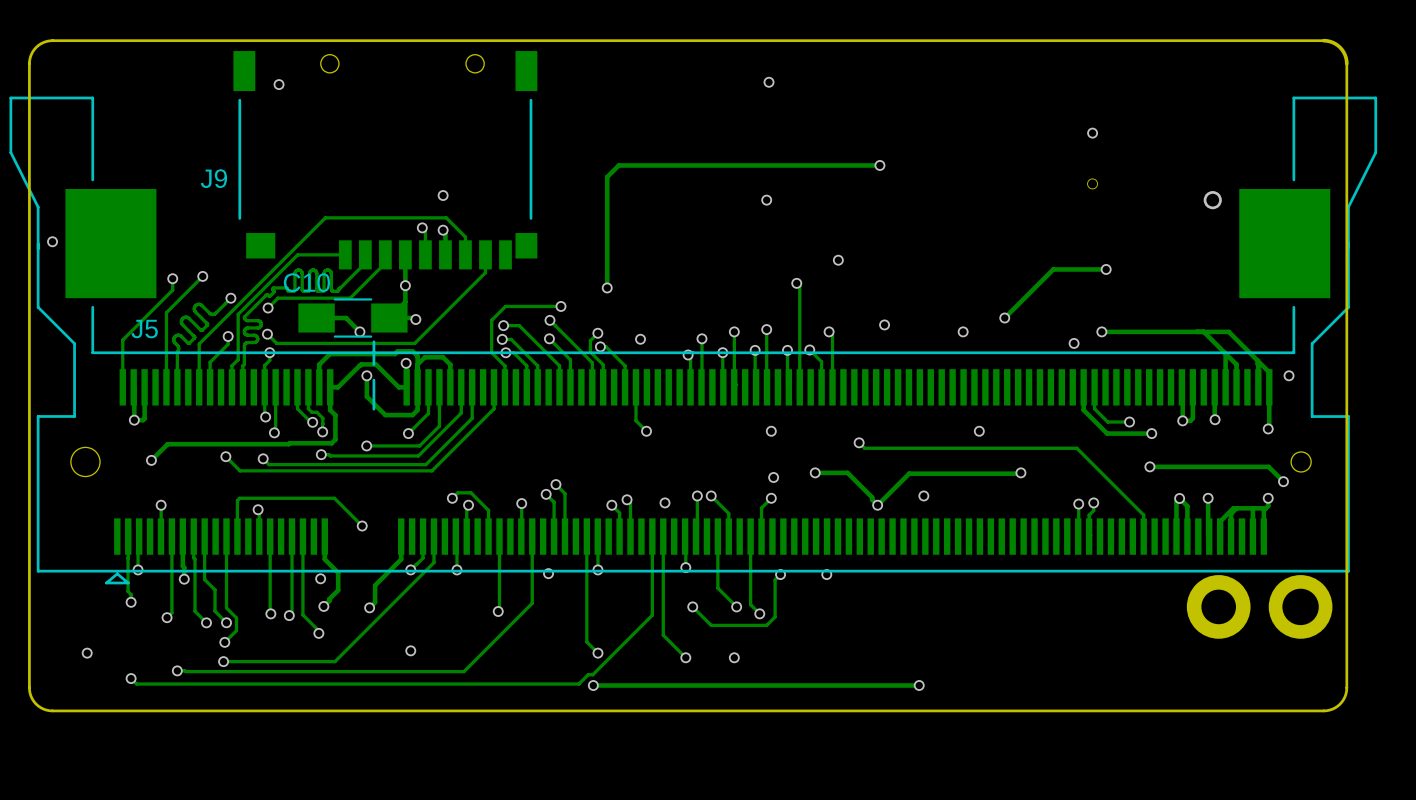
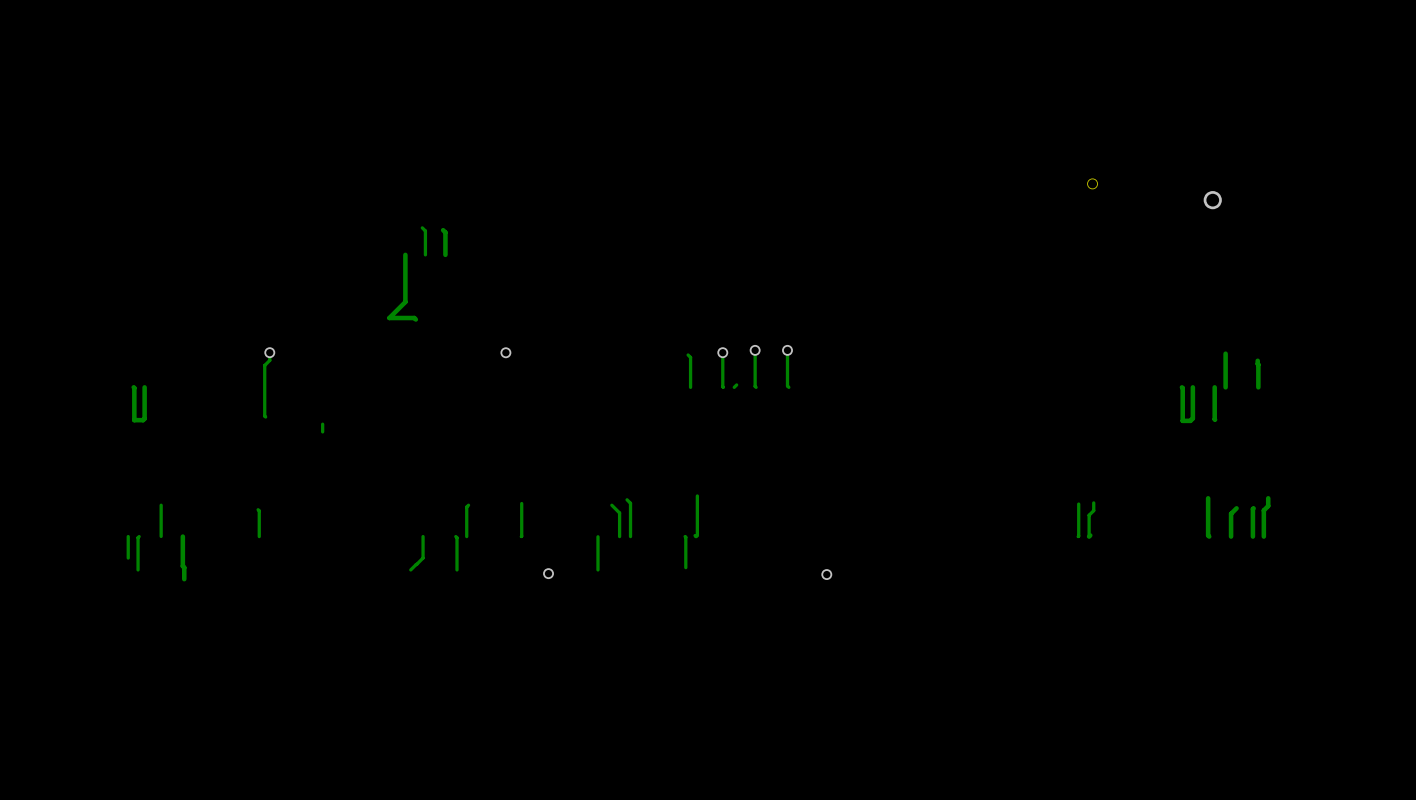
board edge: (1323, 40) (52, 40) (40, 43) (32, 52) (29, 63) (29, 687) (32, 699) (40, 707) (52, 710) (1323, 710) (1335, 707) (1343, 699) (1346, 687) (1346, 63) (1345, 54) (1340, 47) (1332, 42) (1323, 40) -> none
via: (769, 82) -> none
via: (279, 84) -> none
via: (1092, 133) -> none
J9: (385, 160) -> none
track: (879, 165) (618, 165) (607, 177) (607, 287) -> none
via: (879, 165) -> none
via: (443, 195) -> none
via: (766, 200) -> none
via: (422, 227) -> none
via: (443, 230) -> none
via: (52, 241) -> none
track: (345, 254) (297, 254) (238, 314) (238, 359) (231, 365) (231, 387) -> none
track: (365, 254) (365, 263) (338, 290) (332, 291) (331, 287) -> none
track: (385, 254) (385, 263) (350, 298) (277, 298) (268, 308) -> none
track: (465, 254) (465, 237) (446, 217) (325, 217) (199, 344) (199, 387) -> none
track: (485, 254) (485, 272) (414, 343) (276, 343) (267, 334) -> none
via: (838, 260) -> none
track: (1106, 269) (1053, 269) (1004, 318) -> none
via: (1106, 269) -> none
track: (202, 276) (166, 312) (166, 387) -> none
via: (202, 276) -> none
track: (172, 278) (172, 290) (122, 340) (122, 387) -> none
via: (172, 278) -> none
track: (796, 283) (799, 286) (799, 387) -> none
via: (796, 283) -> none
via: (405, 285) -> none
track: (331, 287) (331, 272) (326, 270) (324, 272) (323, 290) (317, 290) (316, 272) (312, 270) (309, 272) (309, 290) (303, 291) (302, 272) (297, 270) (295, 272) (294, 290) (288, 291) (286, 288) (273, 287) (273, 292) (270, 295) (265, 295) (244, 317) (247, 320) (259, 321) (261, 324) (259, 327) (247, 328) (244, 330) (246, 334) (255, 335) (257, 338) (255, 342) (247, 342) (244, 345) (242, 387) -> none
via: (607, 287) -> none
track: (230, 298) (213, 314) (201, 305) (195, 305) (194, 311) (207, 323) -> none
via: (230, 298) -> none
track: (561, 306) (505, 306) (491, 320) (491, 352) (504, 365) (504, 387) -> none
via: (561, 306) -> none
via: (268, 308) -> none
track: (316, 318) (346, 318) (359, 331) -> none
C10: (352, 318) -> none
via: (1004, 318) -> none
via: (415, 319) -> none
track: (549, 320) (592, 362) (592, 387) -> none
via: (549, 320) -> none
via: (884, 324) -> none
track: (207, 325) (202, 330) -> none
track: (503, 325) (519, 325) (559, 365) (559, 387) -> none
via: (503, 325) -> none
track: (766, 329) (767, 387) -> none
via: (766, 329) -> none
track: (200, 330) (188, 317) (182, 318) (182, 324) (194, 336) -> none
via: (359, 331) -> none
track: (734, 331) (734, 387) -> none
via: (734, 331) -> none
track: (829, 331) (832, 335) (832, 387) -> none
via: (829, 331) -> none
via: (963, 331) -> none
track: (1101, 331) (1228, 331) (1269, 372) (1268, 428) -> none
via: (1101, 331) -> none
track: (1203, 331) (1236, 364) (1236, 387) -> none
track: (597, 333) (590, 340) (590, 352) (603, 364) (603, 387) -> none
via: (597, 333) -> none
via: (267, 334) -> none
track: (228, 336) (228, 344) (210, 362) (210, 387) -> none
via: (228, 336) -> none
track: (194, 338) (189, 342) -> none
track: (549, 338) (570, 359) (570, 387) -> none
via: (549, 338) -> none
track: (701, 338) (701, 387) -> none
via: (701, 338) -> none
track: (502, 339) (511, 339) (537, 365) (537, 387) -> none
via: (502, 339) -> none
via: (640, 339) -> none
J5: (693, 340) -> none
track: (187, 342) (179, 335) (173, 338) (178, 348) (177, 387) -> none
via: (1074, 343) -> none
track: (600, 346) (606, 346) (625, 365) (625, 387) -> none
via: (600, 346) -> none
track: (809, 349) (821, 361) (821, 387) -> none
via: (809, 349) -> none
track: (505, 352) (513, 352) (526, 365) (526, 387) -> none
via: (688, 354) -> none
track: (406, 363) (406, 387) (398, 387) (376, 364) (361, 364) (337, 387) (330, 387) (330, 410) (335, 415) (335, 439) (331, 443) (167, 444) (151, 460) -> none
via: (406, 363) -> none
track: (417, 364) (424, 357) (443, 357) (450, 364) (450, 387) -> none
track: (366, 375) (366, 396) (385, 415) (412, 415) (417, 410) (417, 356) (412, 351) (397, 351) (395, 354) (329, 354) (319, 364) (319, 387) -> none
via: (366, 375) -> none
via: (1289, 375) -> none
track: (275, 387) (274, 432) -> none
track: (297, 387) (297, 408) (312, 422) -> none
track: (308, 387) (308, 408) (311, 412) (316, 412) (322, 418) (322, 423) -> none
track: (428, 387) (428, 413) (408, 433) -> none
track: (439, 387) (439, 426) (419, 445) (366, 445) -> none
track: (461, 387) (461, 413) (418, 455) (321, 454) -> none
track: (472, 387) (472, 418) (425, 464) (269, 464) (263, 458) -> none
track: (494, 387) (494, 408) (432, 470) (240, 470) (225, 456) -> none
track: (635, 387) (635, 420) (646, 431) -> none
track: (1083, 387) (1083, 410) (1107, 433) (1151, 433) -> none
track: (1094, 387) (1094, 408) (1107, 422) (1129, 422) -> none
via: (265, 417) -> none
via: (1215, 419) -> none
via: (134, 420) -> none
via: (1182, 420) -> none
via: (312, 422) -> none
via: (1129, 422) -> none
via: (1268, 428) -> none
via: (322, 431) -> none
via: (646, 431) -> none
via: (771, 431) -> none
via: (979, 431) -> none
via: (274, 432) -> none
via: (408, 433) -> none
via: (1151, 433) -> none
track: (859, 442) (864, 448) (1076, 448) (1143, 515) (1143, 536) -> none
via: (859, 442) -> none
via: (366, 445) -> none
via: (321, 454) -> none
via: (225, 456) -> none
via: (263, 458) -> none
via: (151, 460) -> none
track: (1149, 466) (1268, 466) (1283, 481) -> none
via: (1149, 466) -> none
via: (815, 472) -> none
track: (1020, 472) (909, 473) (877, 505) (847, 472) (815, 472) -> none
via: (1020, 472) -> none
via: (773, 477) -> none
via: (1283, 481) -> none
track: (555, 484) (565, 493) (565, 536) -> none
via: (555, 484) -> none
track: (546, 494) (554, 502) (554, 536) -> none
via: (546, 494) -> none
via: (697, 495) -> none
track: (711, 495) (728, 513) (728, 536) -> none
via: (711, 495) -> none
via: (923, 495) -> none
track: (452, 498) (457, 492) (470, 492) (488, 510) (488, 536) -> none
via: (452, 498) -> none
track: (771, 498) (761, 508) (761, 536) -> none
via: (771, 498) -> none
via: (1179, 498) -> none
via: (1208, 498) -> none
via: (1268, 498) -> none
via: (627, 499) -> none
via: (665, 502) -> none
via: (1093, 502) -> none
via: (521, 503) -> none
via: (1078, 504) -> none
via: (161, 505) -> none
via: (468, 505) -> none
via: (611, 505) -> none
via: (877, 505) -> none
track: (1265, 508) (1233, 508) (1220, 521) (1220, 536) -> none
via: (258, 509) -> none
track: (362, 526) (334, 498) (239, 498) (237, 500) (237, 536) -> none
via: (362, 526) -> none
track: (171, 536) (171, 612) (167, 617) -> none
track: (193, 536) (195, 611) (206, 622) -> none
track: (204, 536) (204, 579) (215, 589) (215, 611) (226, 622) -> none
track: (226, 536) (226, 607) (236, 617) (236, 630) (224, 642) -> none
track: (270, 536) (270, 613) -> none
track: (292, 536) (292, 612) (289, 615) -> none
track: (302, 536) (302, 614) (318, 630) (318, 633) -> none
track: (324, 536) (324, 559) (338, 572) (338, 590) (323, 606) -> none
track: (401, 536) (401, 559) (375, 585) (375, 602) (369, 607) -> none
track: (433, 536) (433, 562) (334, 661) (223, 661) -> none
track: (499, 536) (498, 611) -> none
track: (532, 536) (532, 603) (463, 671) (177, 670) -> none
track: (586, 536) (586, 642) (597, 653) -> none
track: (652, 536) (652, 615) (592, 674) (588, 674) (578, 684) (136, 684) (131, 678) -> none
track: (663, 536) (663, 635) (685, 657) -> none
track: (717, 536) (717, 588) (736, 606) -> none
track: (750, 536) (750, 604) (759, 613) -> none
track: (1187, 536) (1187, 506) (1179, 498) (1176, 501) (1176, 536) -> none
track: (128, 558) (128, 591) (131, 594) (131, 602) -> none
via: (685, 567) -> none
via: (138, 569) -> none
via: (410, 569) -> none
via: (456, 569) -> none
via: (597, 569) -> none
track: (780, 574) (775, 580) (775, 617) (766, 625) (711, 625) (692, 606) -> none
via: (780, 574) -> none
via: (320, 578) -> none
via: (184, 579) -> none
via: (131, 602) -> none
via: (323, 606) -> none
via: (692, 606) -> none
via: (736, 606) -> none
part: (1259, 606) -> none
via: (369, 607) -> none
via: (498, 611) -> none
via: (270, 613) -> none
via: (759, 613) -> none
via: (289, 615) -> none
via: (167, 617) -> none
via: (206, 622) -> none
via: (226, 622) -> none
via: (318, 633) -> none
via: (224, 642) -> none
via: (410, 650) -> none
via: (87, 653) -> none
via: (597, 653) -> none
via: (685, 657) -> none
via: (734, 657) -> none
via: (223, 661) -> none
via: (177, 670) -> none
via: (131, 678) -> none
via: (593, 685) -> none
track: (919, 685) (593, 685) -> none
via: (919, 685) -> none

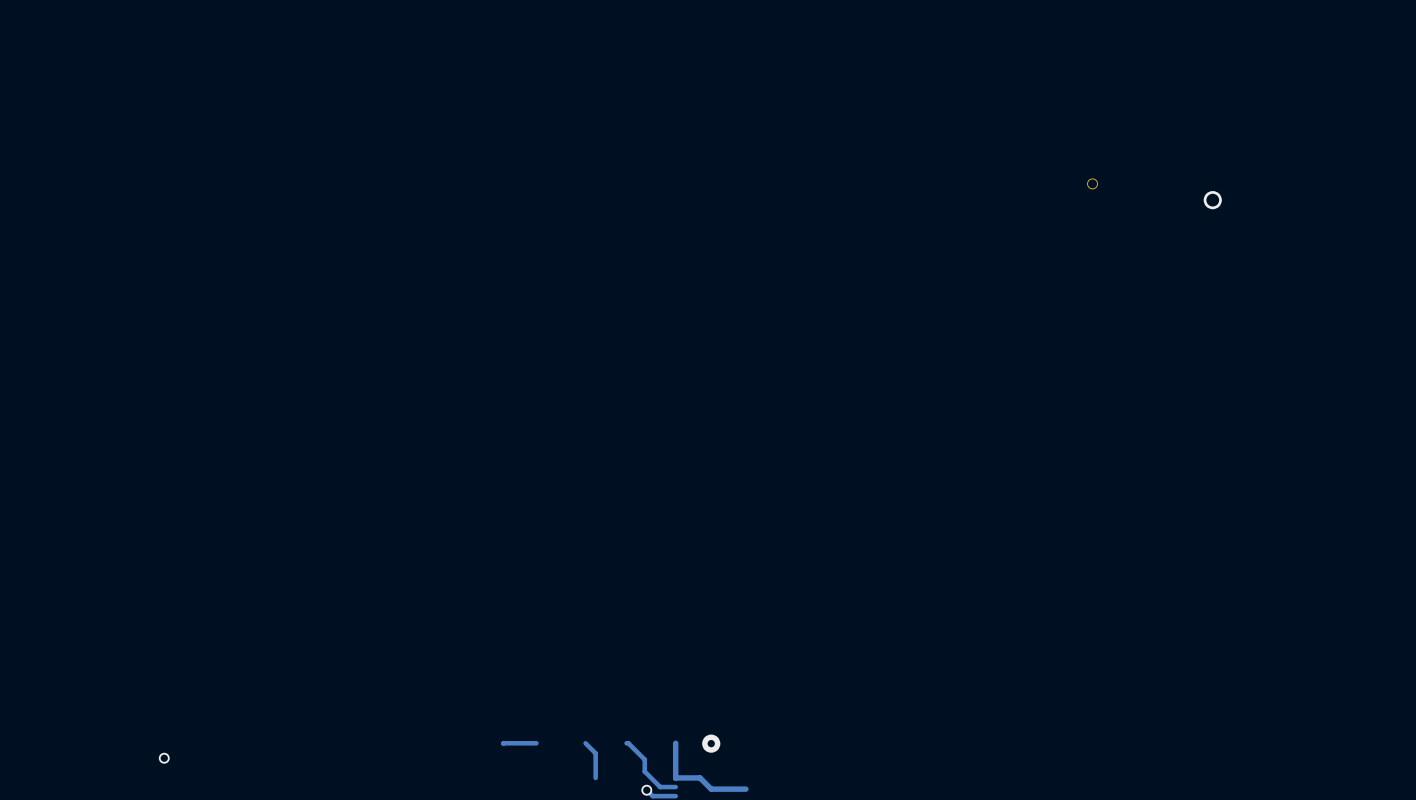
track: (422, 227) (425, 230) (425, 254) -> none
track: (443, 230) (445, 232) (445, 254) -> none
track: (405, 254) (405, 302) (389, 318) (415, 319) -> none
track: (755, 350) (756, 387) -> none
via: (755, 350) -> none
track: (787, 350) (788, 387) -> none
via: (787, 350) -> none
track: (269, 352) (269, 360) (264, 365) (265, 417) -> none
via: (269, 352) -> none
via: (505, 352) -> none
track: (722, 352) (723, 387) -> none
via: (722, 352) -> none
track: (1225, 353) (1225, 387) -> none
track: (688, 354) (690, 357) (690, 387) -> none
track: (1257, 360) (1258, 387) -> none
track: (736, 384) (734, 387) -> none
track: (144, 387) (143, 420) (134, 420) (133, 387) -> none
track: (1192, 387) (1192, 418) (1190, 420) (1182, 420) (1181, 387) -> none
track: (1214, 387) (1215, 419) -> none
track: (322, 424) (322, 431) -> none
track: (697, 495) (697, 535) (695, 535) -> none
track: (1208, 498) (1209, 536) -> none
track: (1268, 498) (1268, 506) (1263, 510) (1263, 536) -> none
track: (627, 499) (630, 503) (630, 536) -> none
track: (1093, 502) (1093, 510) (1089, 515) (1089, 536) (1090, 535) -> none
track: (521, 503) (521, 536) -> none
track: (1078, 504) (1078, 536) -> none
track: (161, 505) (161, 536) -> none
track: (468, 505) (466, 507) (466, 536) -> none
track: (611, 505) (619, 512) (619, 536) -> none
track: (1236, 508) (1231, 513) (1231, 536) -> none
track: (1253, 508) (1252, 536) -> none
track: (258, 509) (259, 536) -> none
track: (128, 536) (128, 558) -> none
track: (139, 536) (138, 569) -> none
track: (182, 536) (184, 579) -> none
track: (423, 536) (423, 558) (410, 569) -> none
track: (455, 536) (456, 569) -> none
track: (597, 536) (597, 569) -> none
track: (685, 536) (685, 567) -> none
via: (548, 573) -> none
via: (826, 574) -> none
track: none -> (536, 743) (503, 743)
track: none -> (585, 743) (595, 753) (595, 777)
track: none -> (626, 743) (644, 759) (644, 771) (660, 787) (675, 787)
track: none -> (675, 743) (675, 777) (700, 777) (711, 789) (745, 789)
via: none -> (711, 743)
via: none -> (164, 758)
track: none -> (646, 790) (652, 796) (675, 796)
via: none -> (646, 790)

